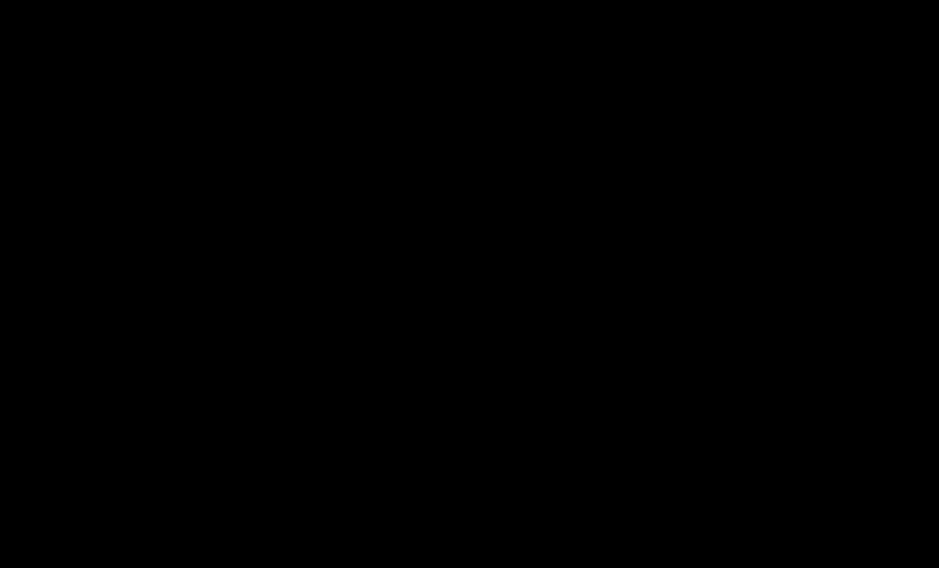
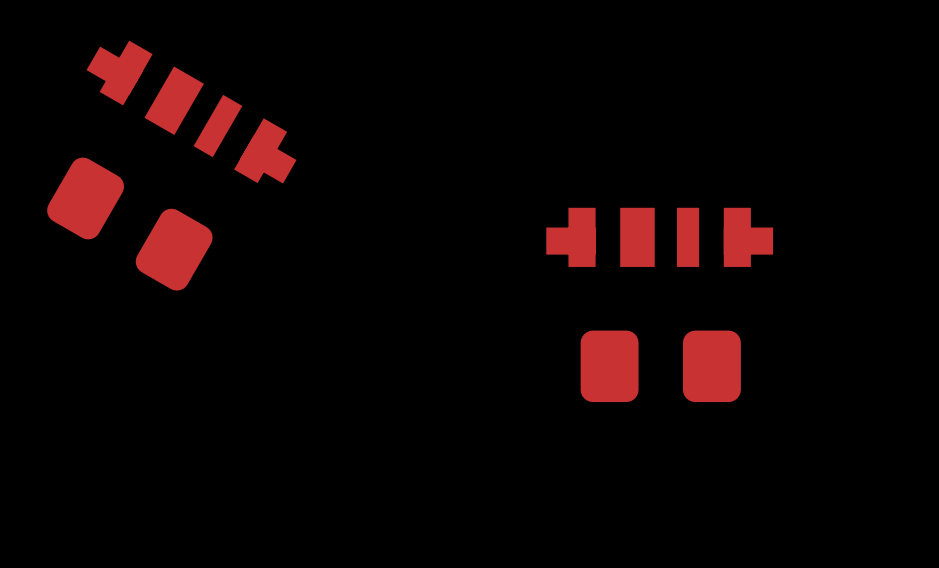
part: none -> (191, 112)
part: none -> (129, 224)
part: none -> (659, 237)
part: none -> (660, 366)

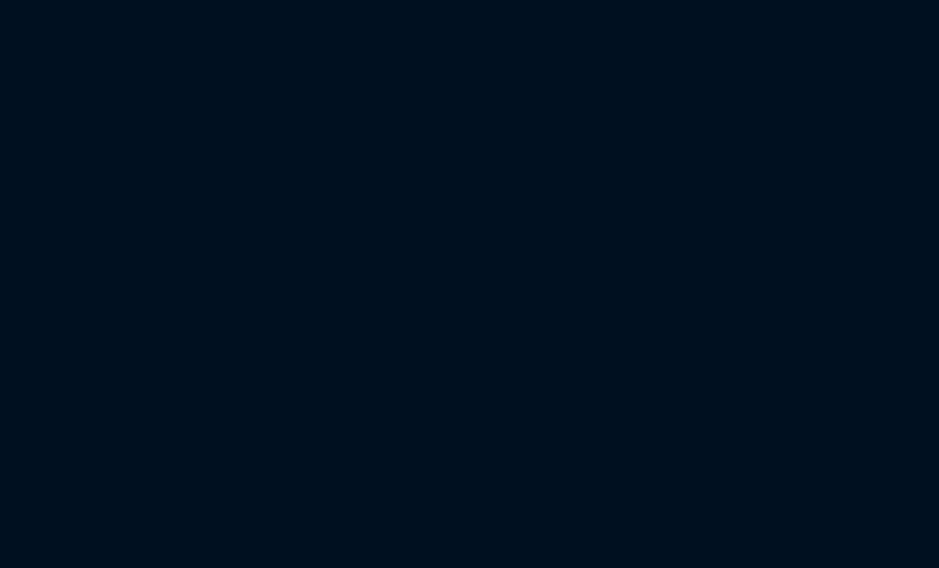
part: (191, 112) -> none
part: (129, 224) -> none
part: (659, 237) -> none
part: (660, 366) -> none

